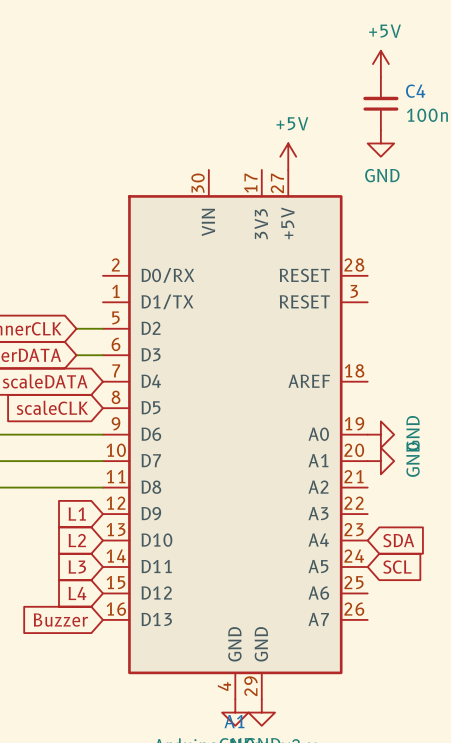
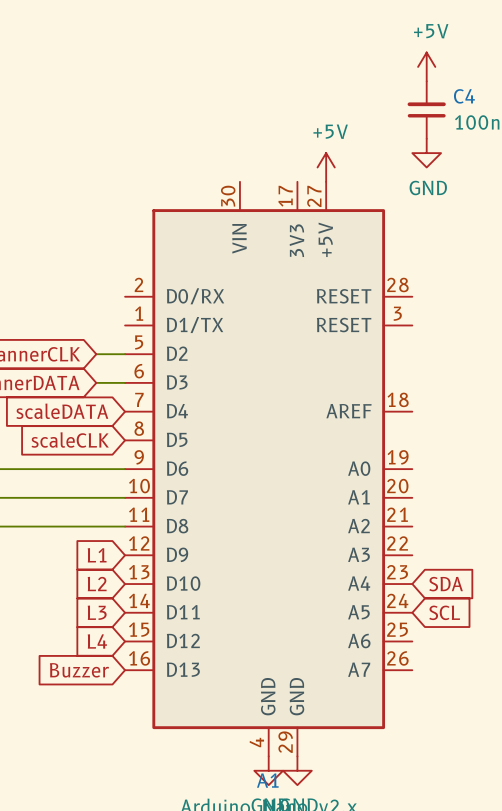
power symbol: GND (380, 434) -> none
power symbol: GND (380, 461) -> none

